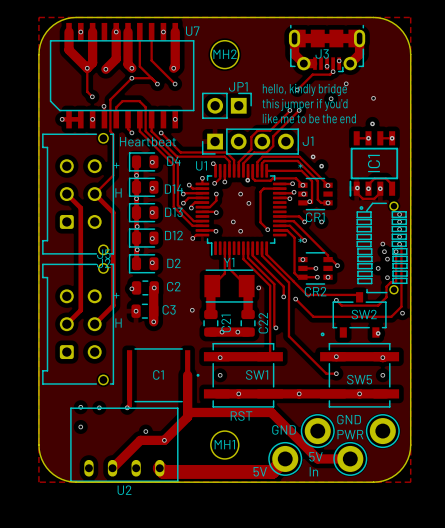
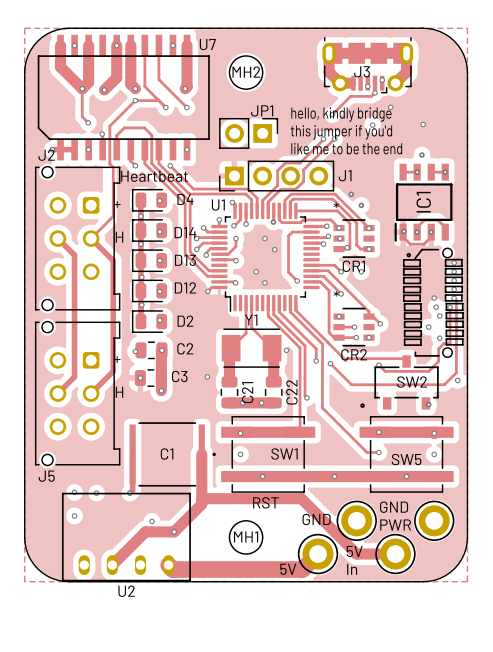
J2 rotation: 0° (78, 194) -> 180° (77, 238)
J5 rotation: 0° (78, 324) -> 180° (77, 393)

